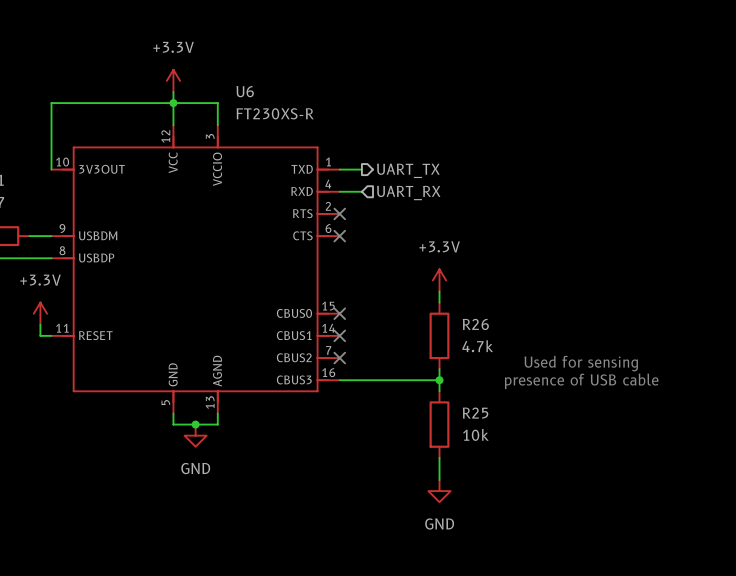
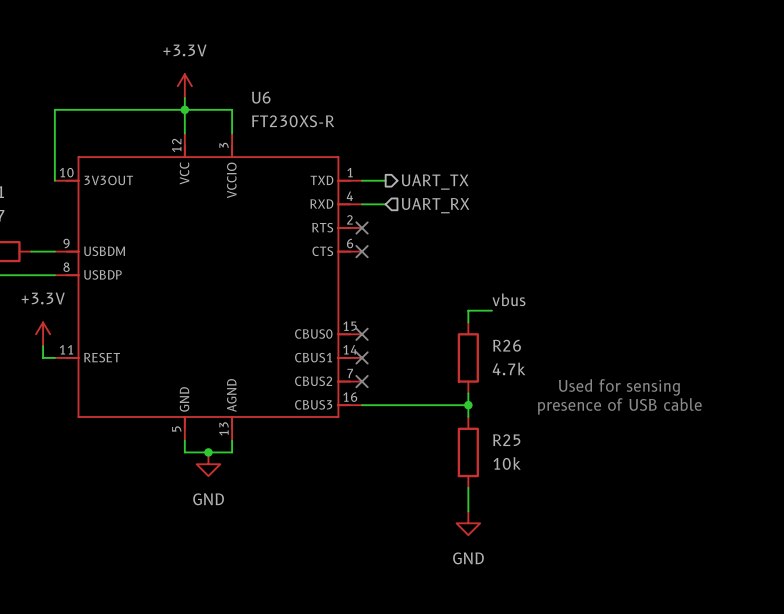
power symbol: +3.3V (439, 280) -> none
label: none -> vbus (508, 299)
wire: none -> (468, 310) (491, 310)

